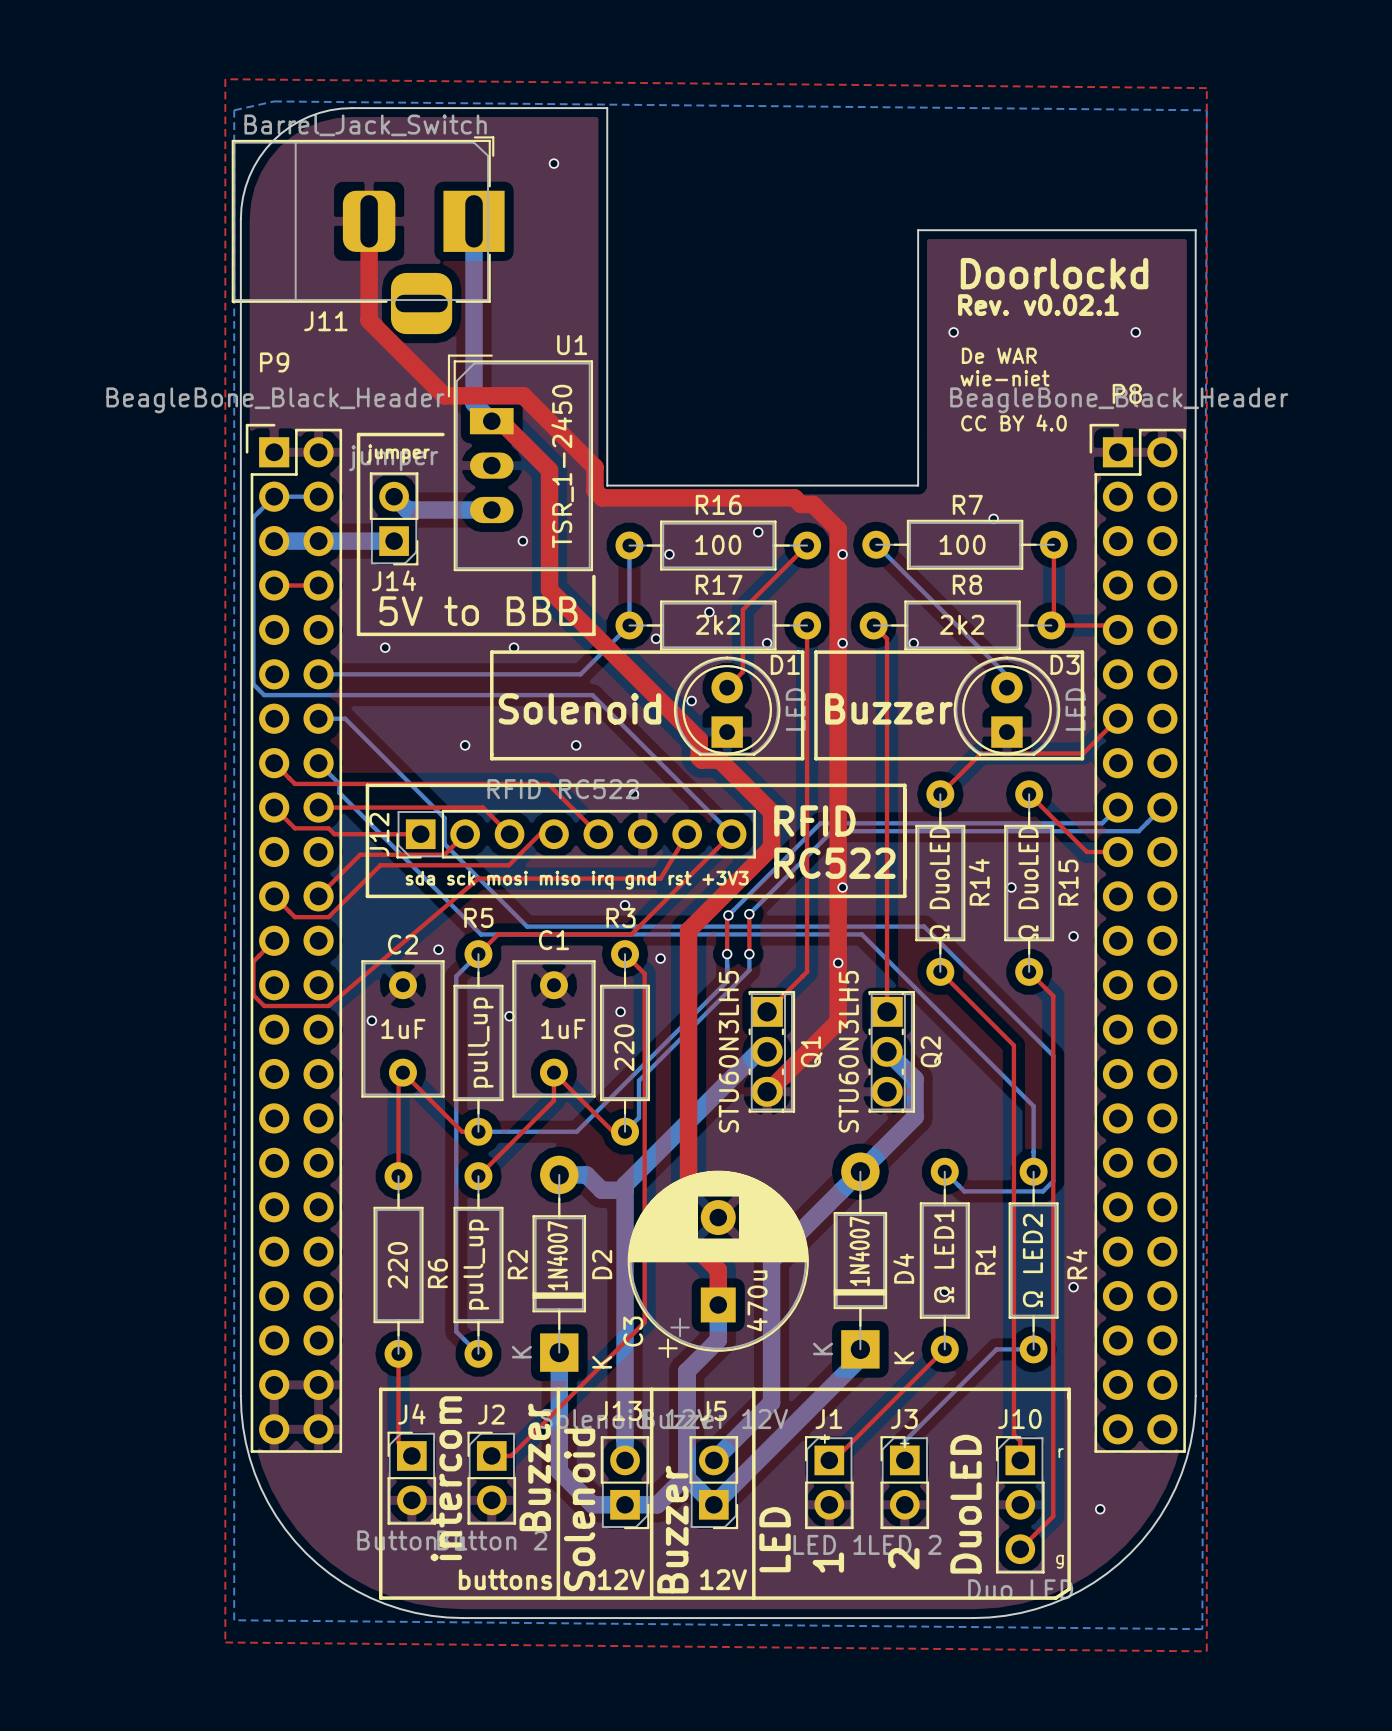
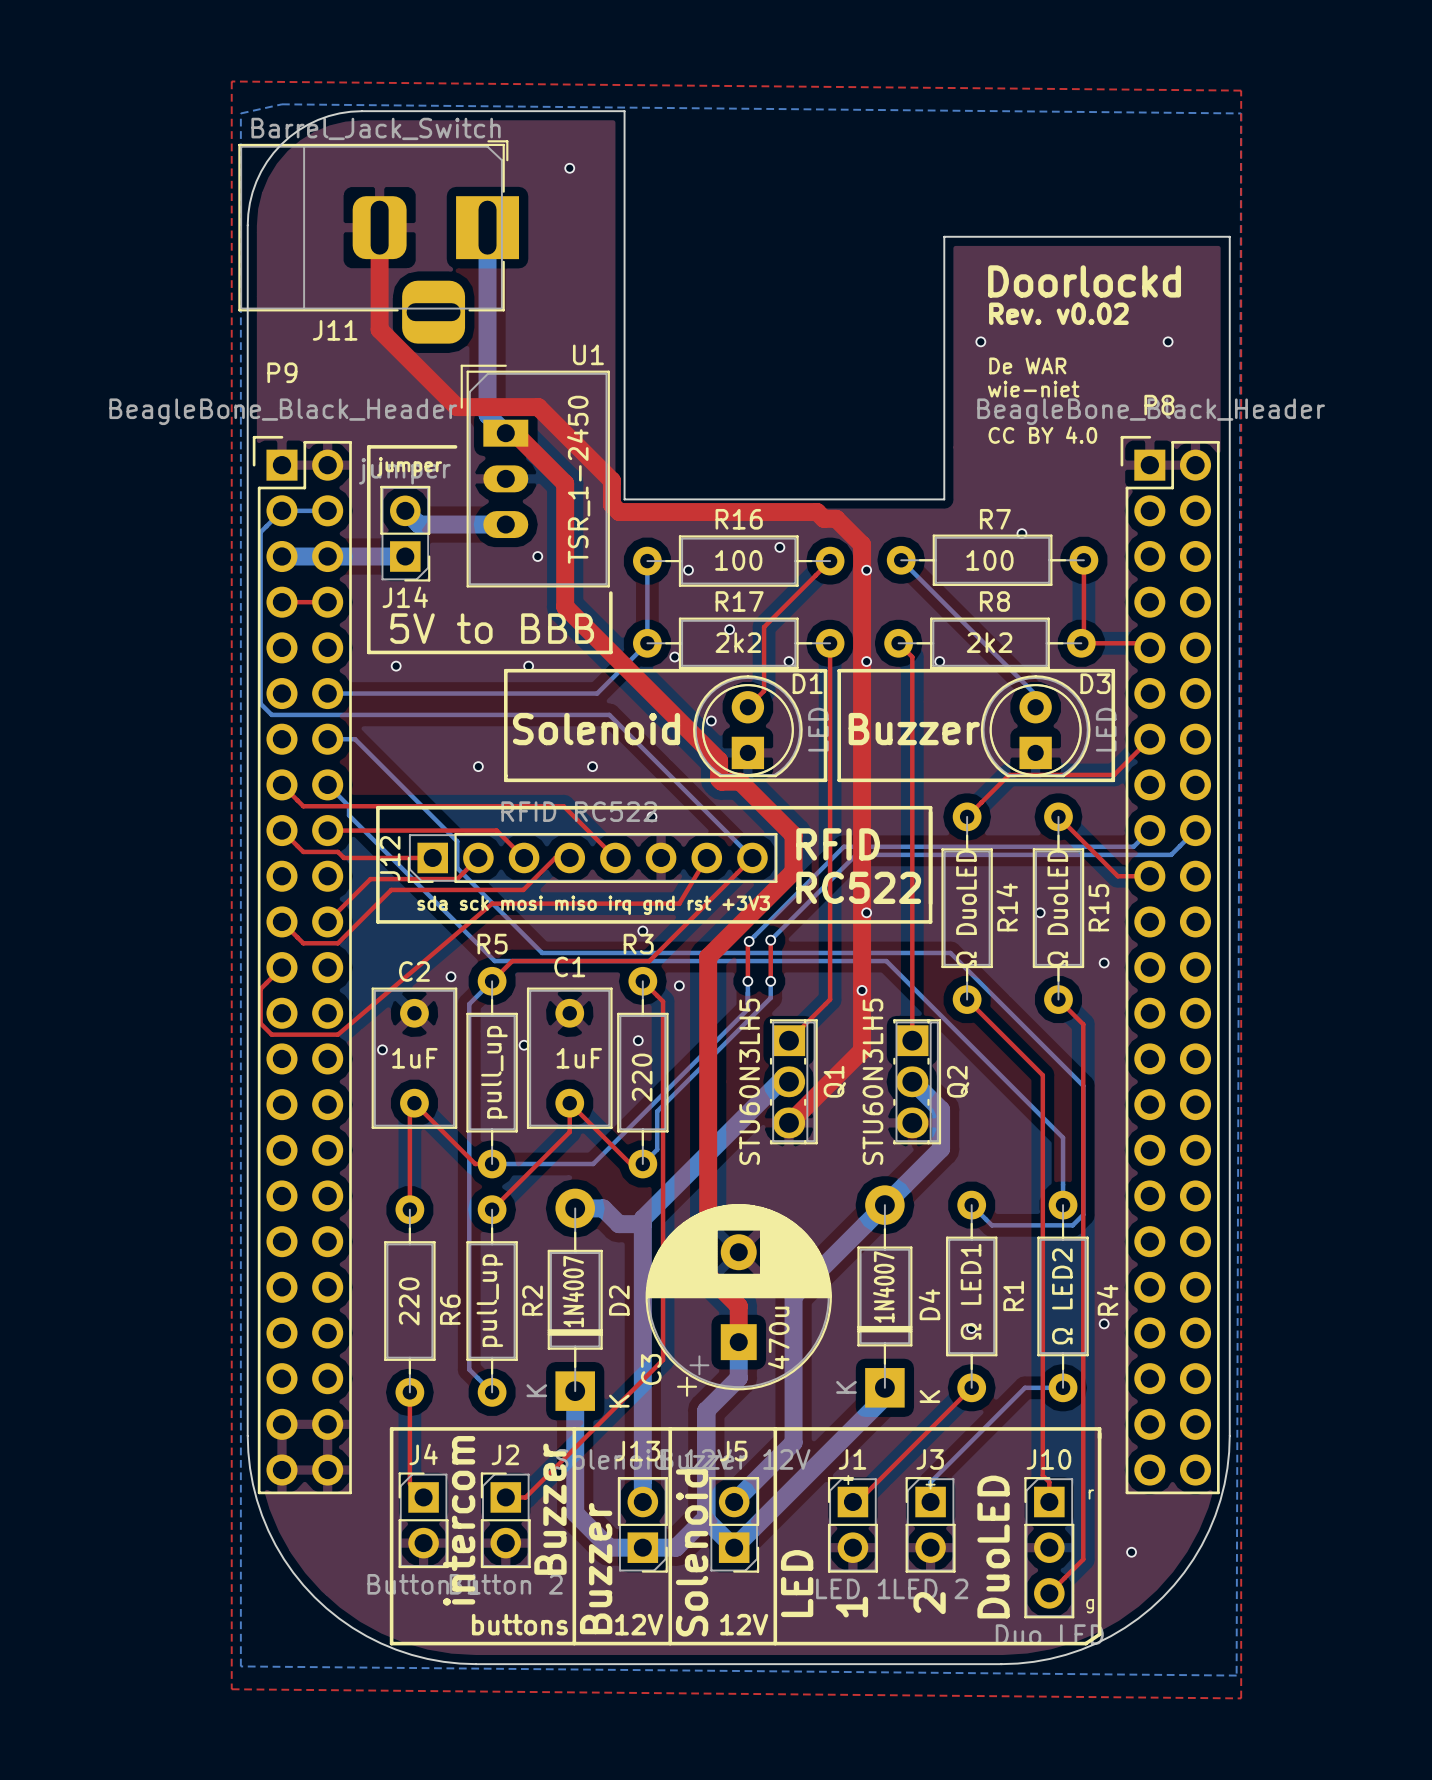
text: Rev. v0.02.1 (1038, 305) -> Rev. v0.02 (1058, 313)
text position: Solenoid (579, 1509) -> Solenoid (692, 1552)
text position: Buzzer (672, 1529) -> Buzzer (596, 1568)

